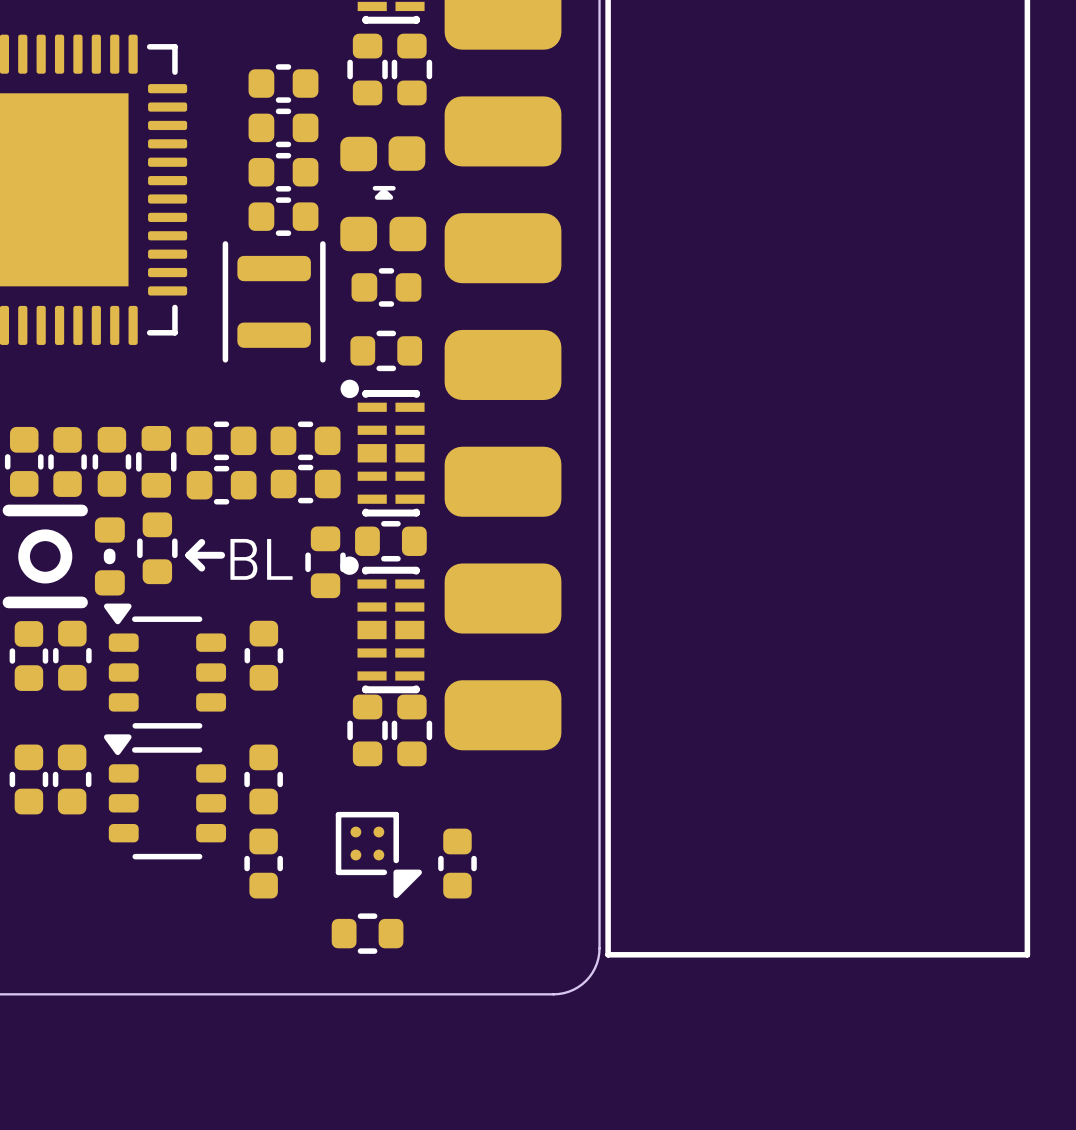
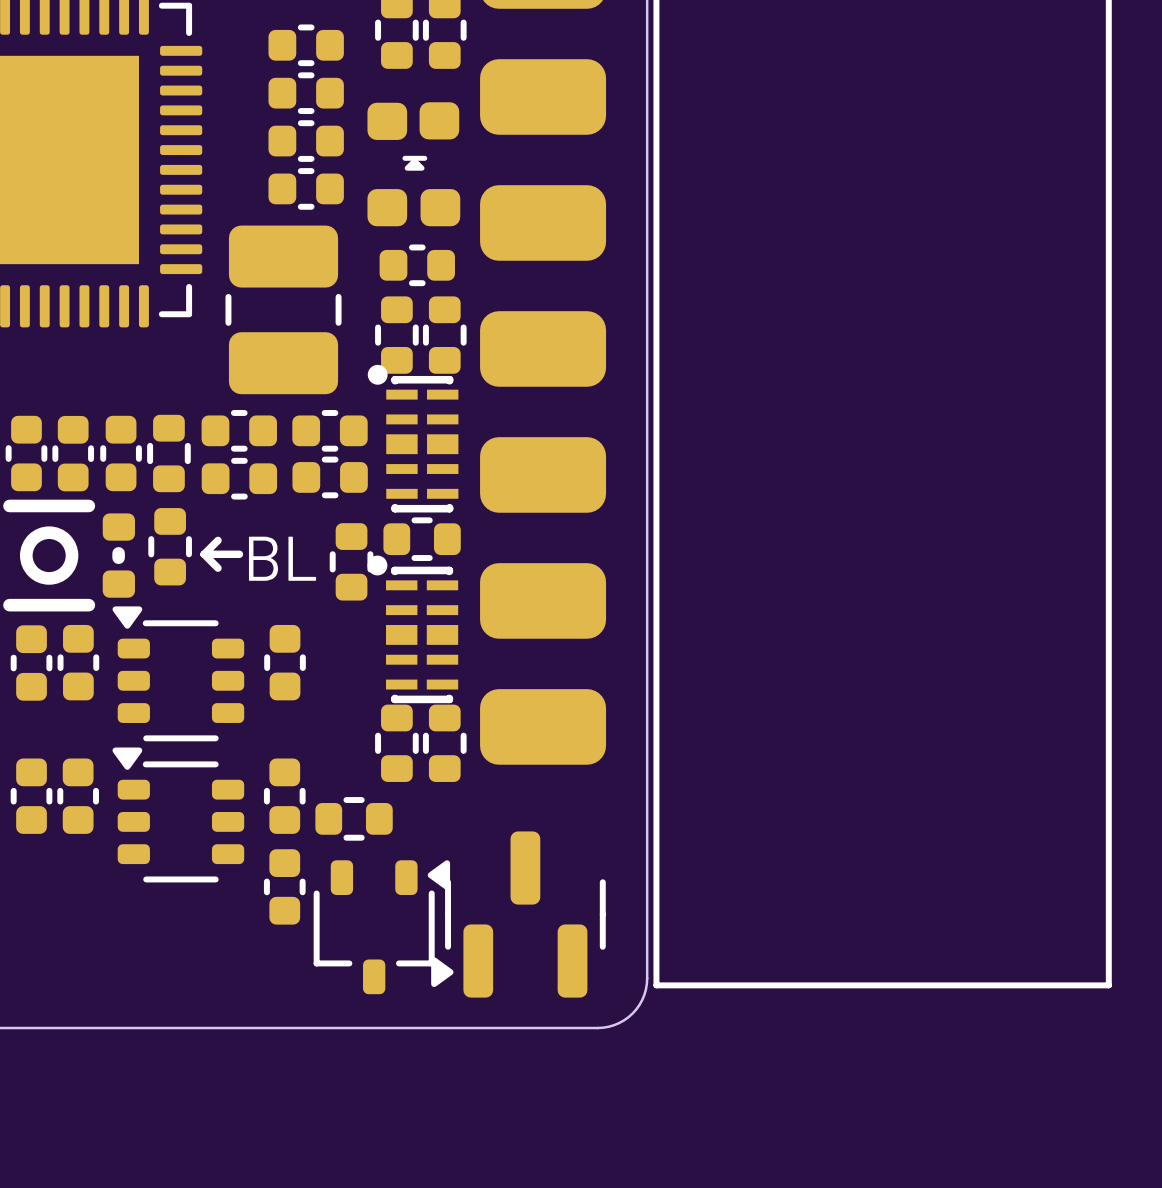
part footprint: [222, 241, 326, 363] -> [225, 225, 342, 395]
part: (386, 350) -> none
part: none -> (396, 335)
part: none -> (444, 335)
part footprint: [438, 828, 477, 899] -> [431, 831, 606, 998]
part: (378, 855) -> none
part: none -> (381, 927)
part position: (367, 933) -> (354, 818)

